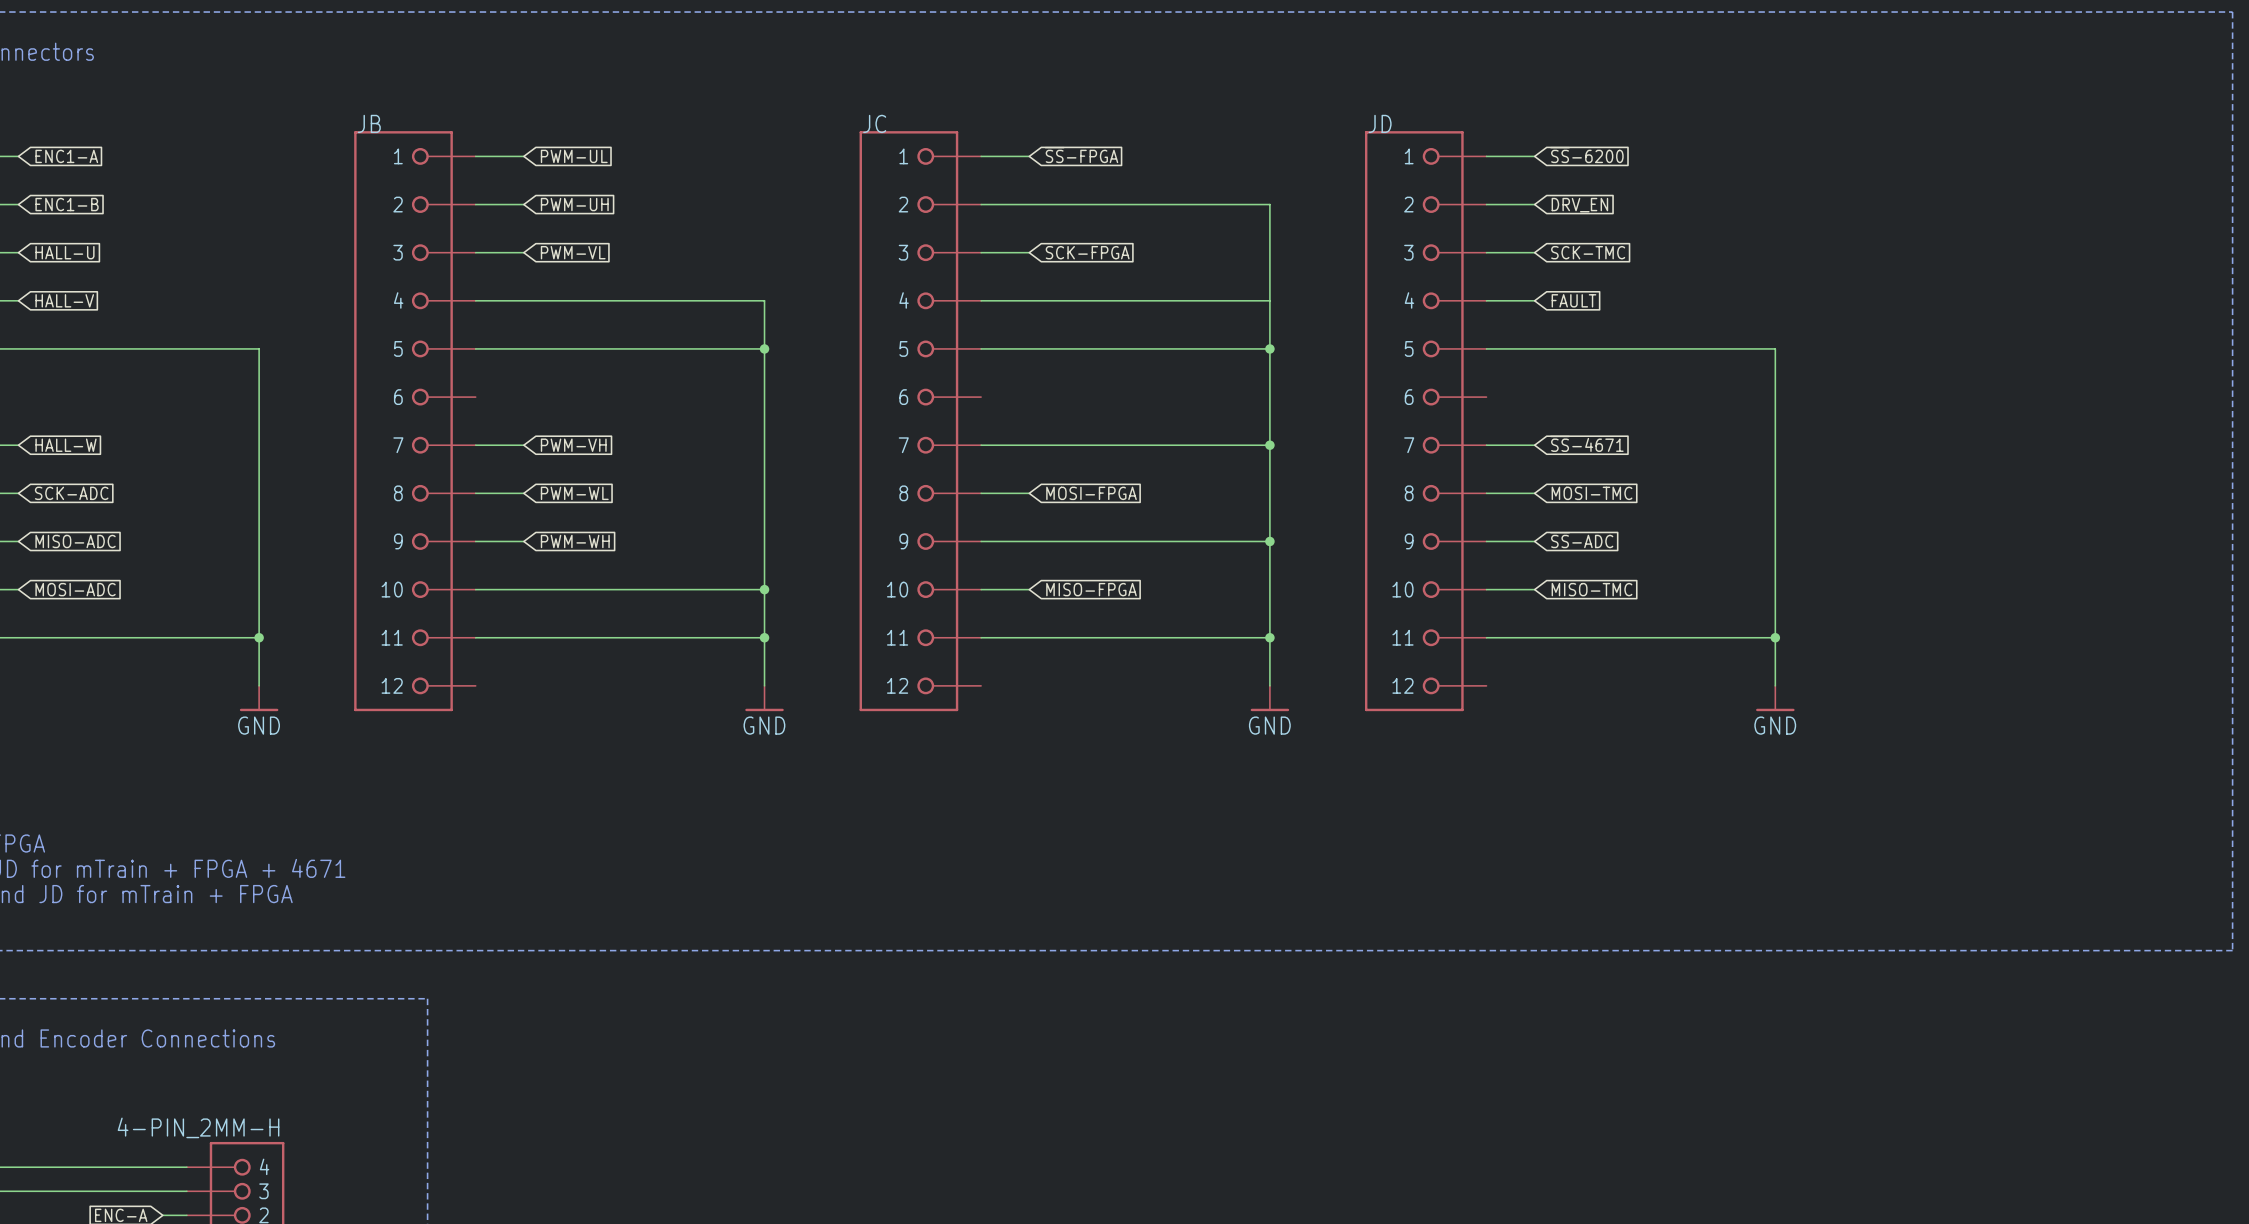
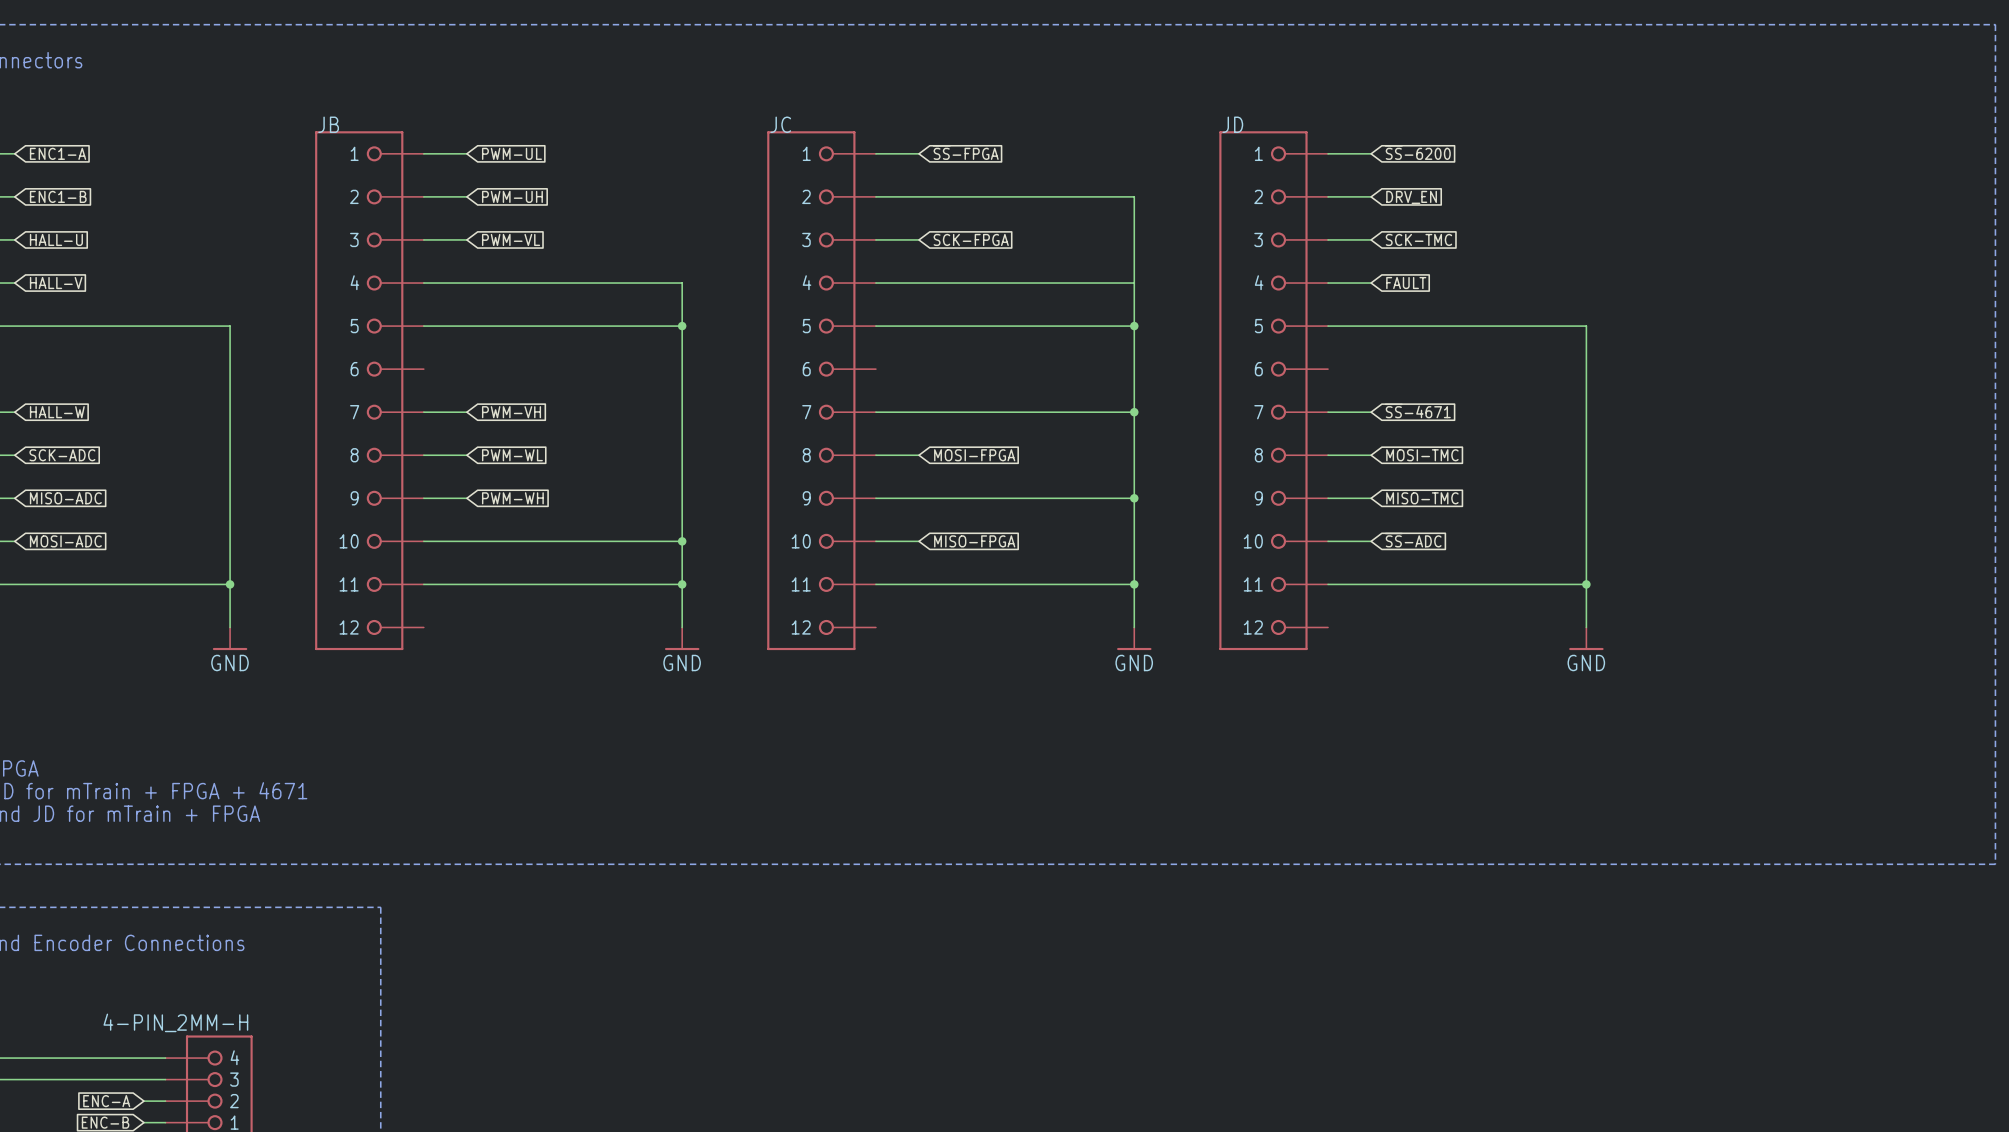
global label: ~{SS}-ADC (1581, 540) -> MISO-TMC (1422, 498)
global label: MISO-TMC (1592, 589) -> ~{SS}-ADC (1413, 540)

